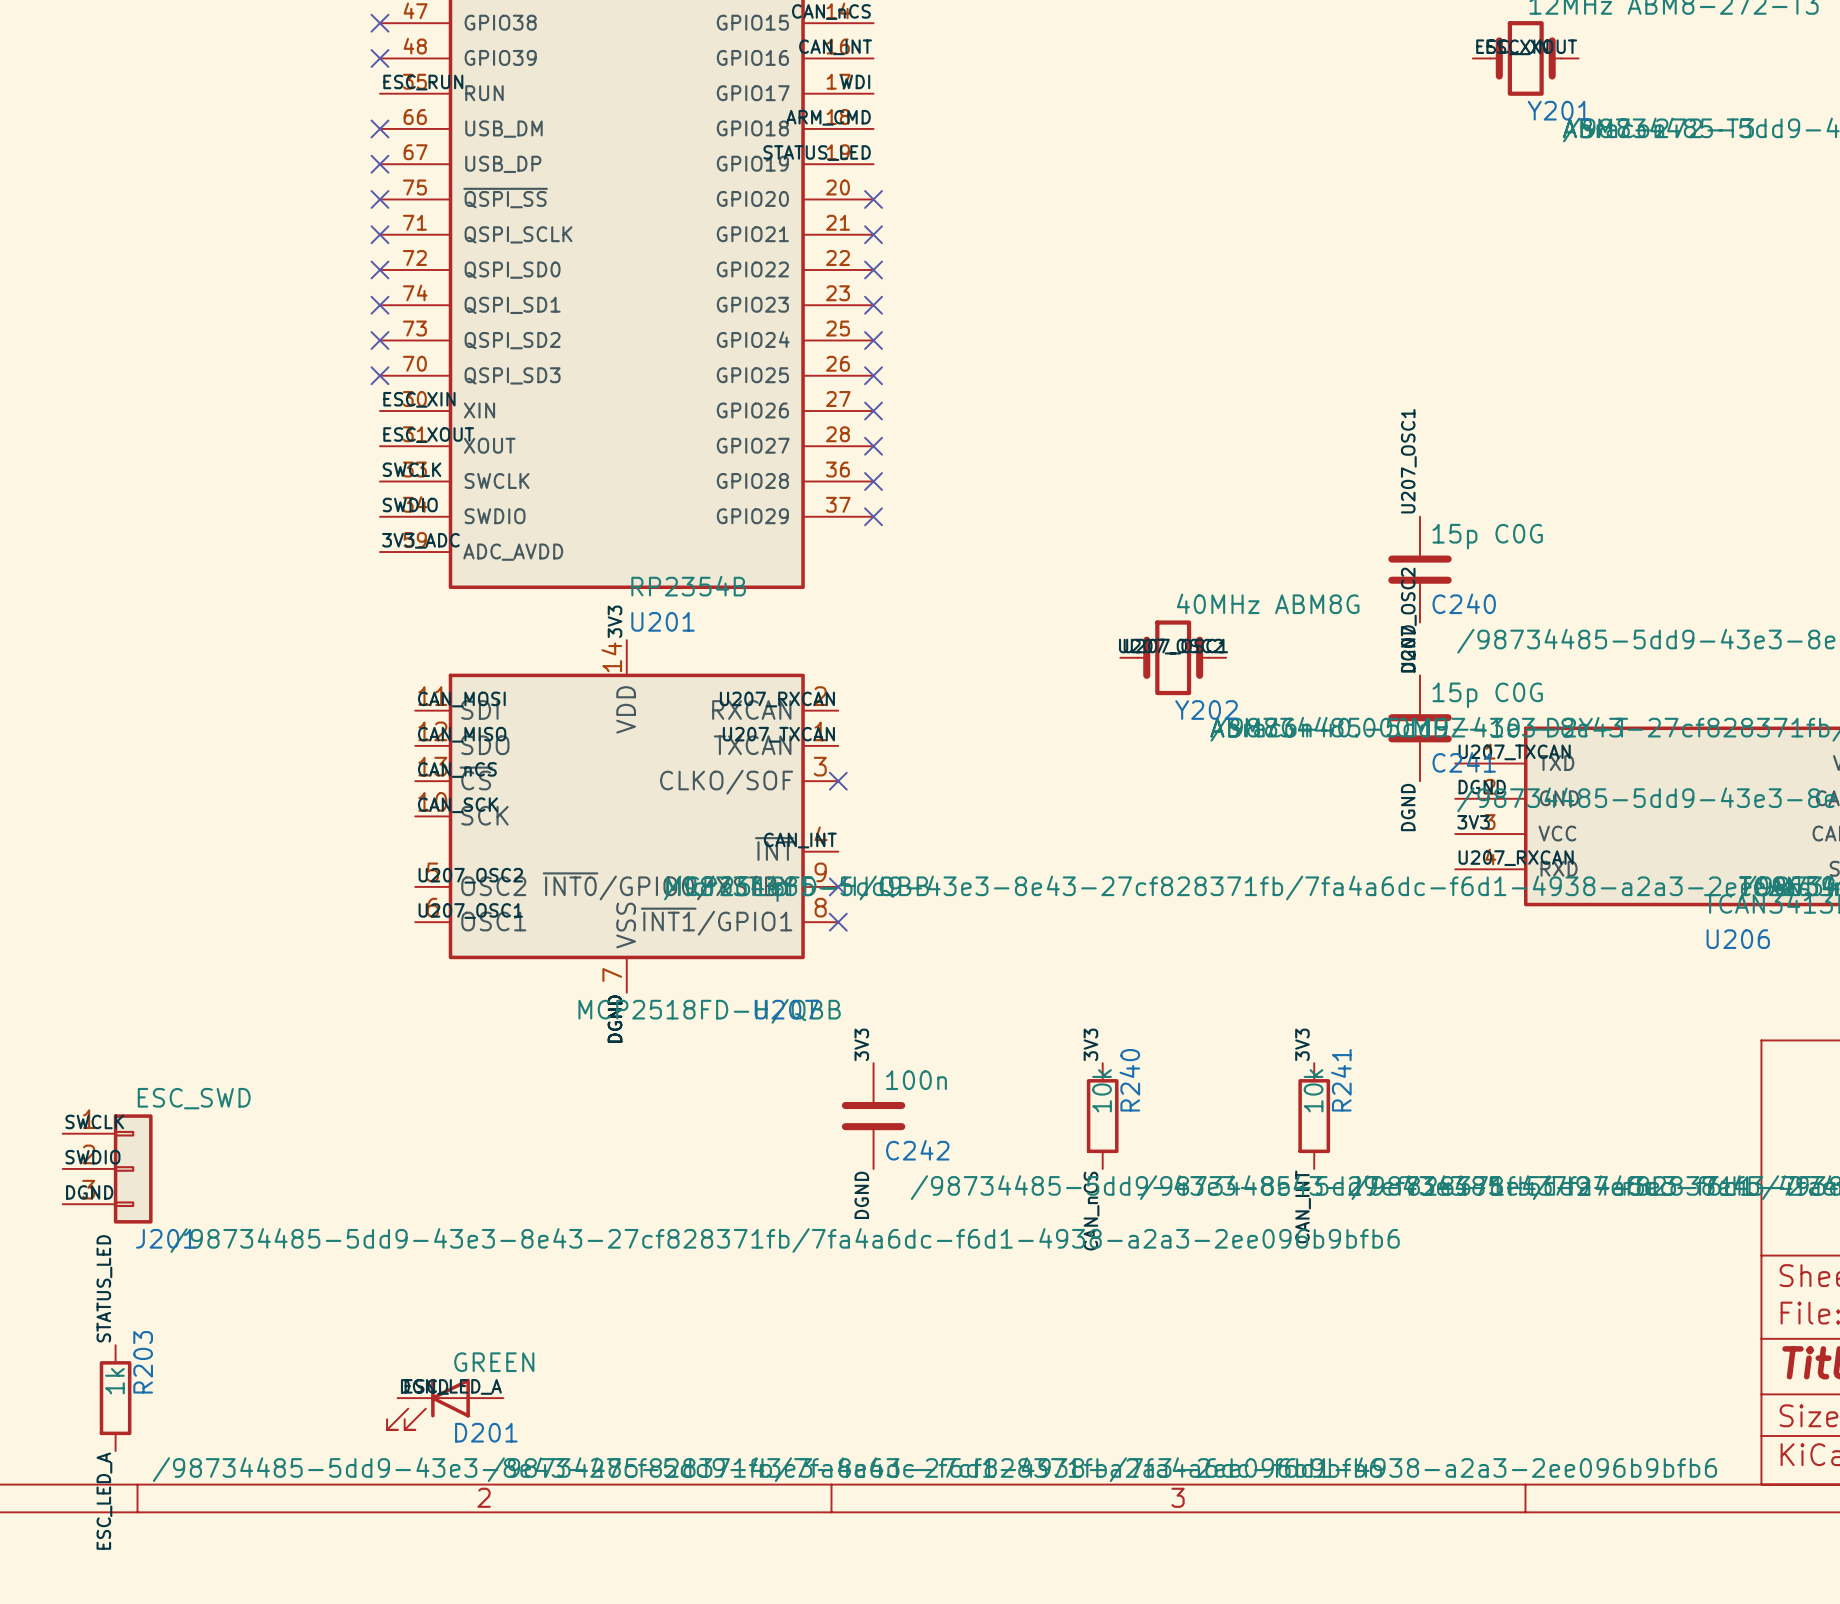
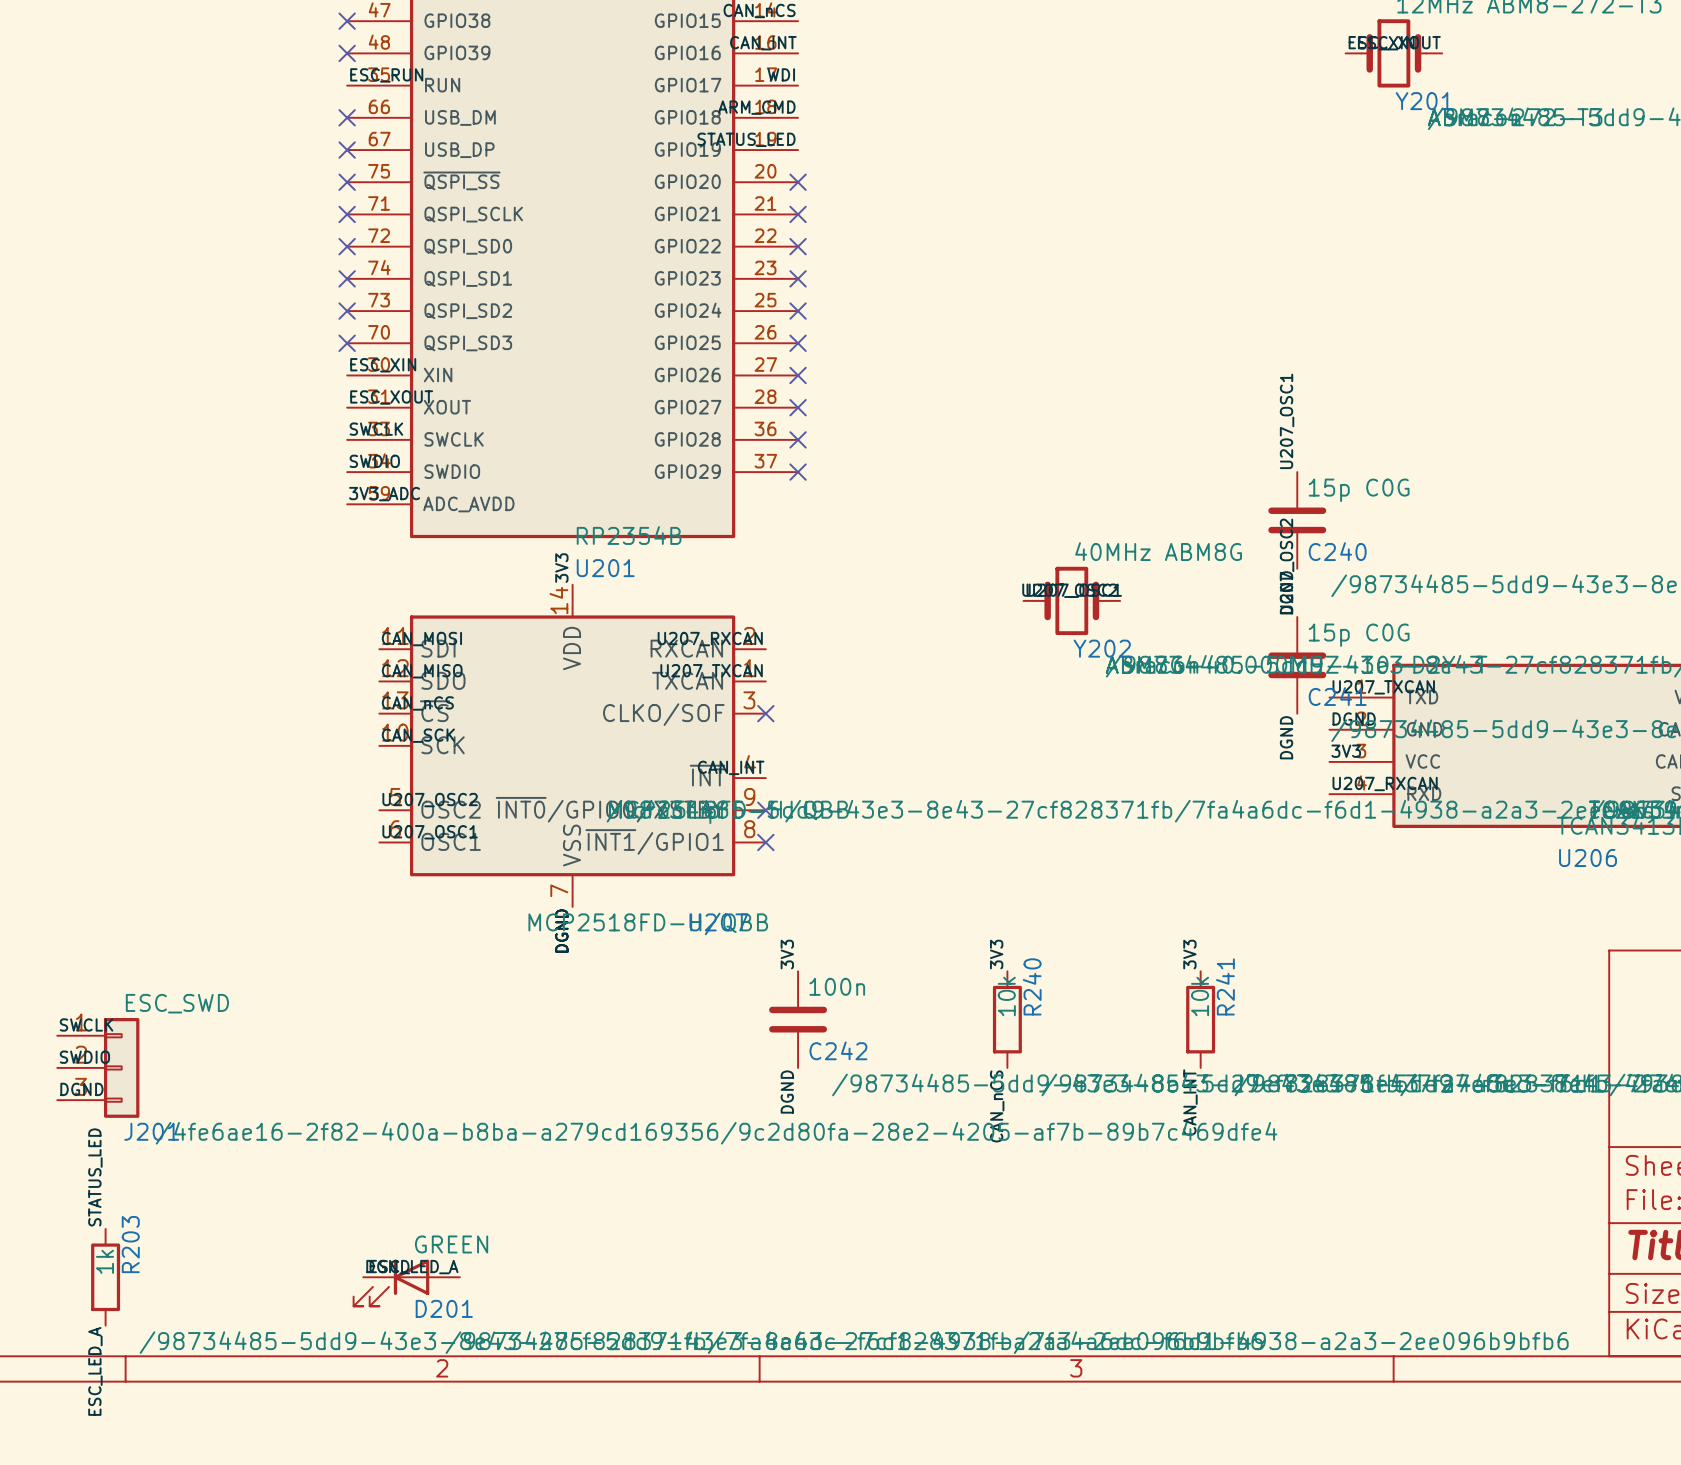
J201 text: /98734485-5dd9-43e3-8e43-27cf828371fb/7fa4a6dc-f6d1-4938-a2a3-2ee096b9bfb6 (785, 1240) -> /4fe6ae16-2f82-400a-b8ba-a279cd169356/9c2d80fa-28e2-4205-af7b-89b7c469dfe4 (716, 1133)

